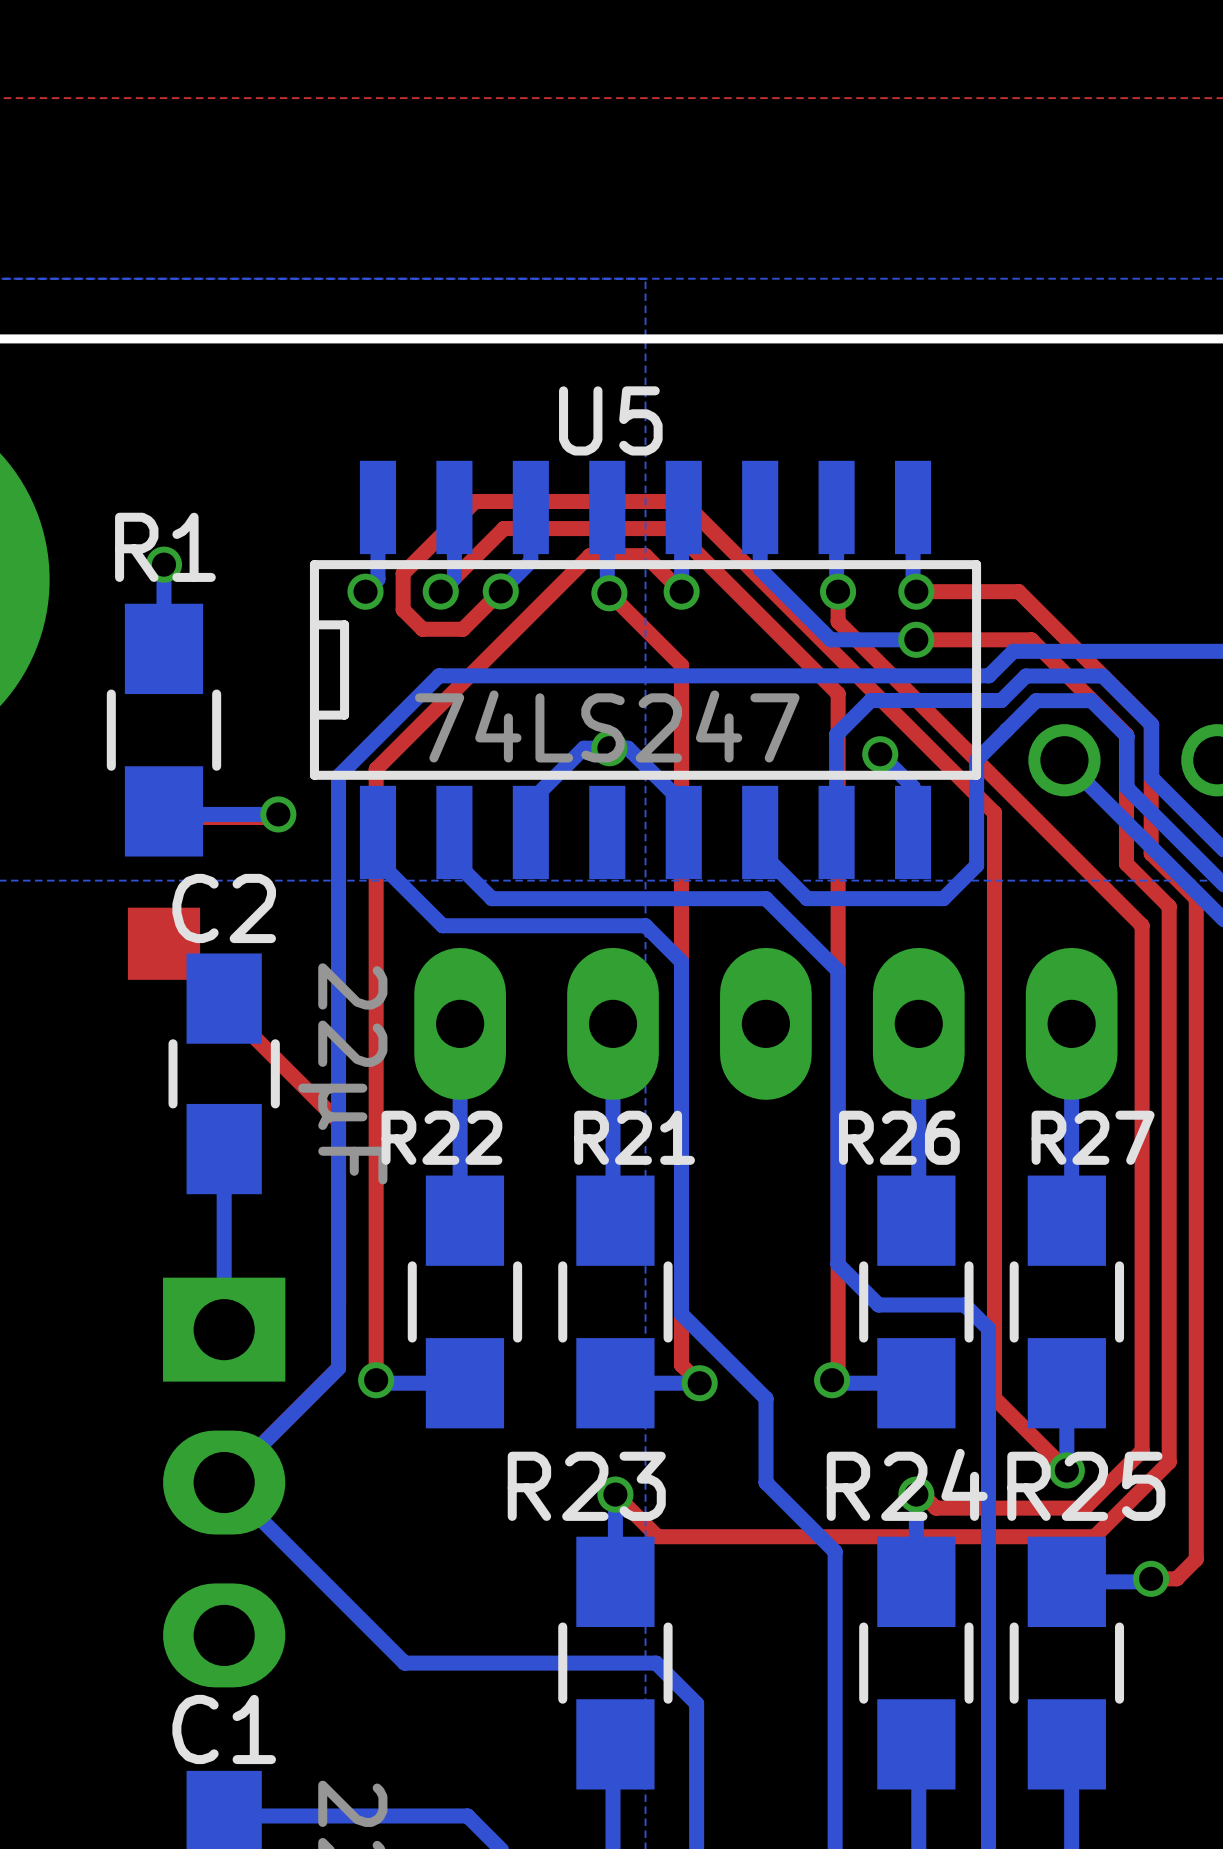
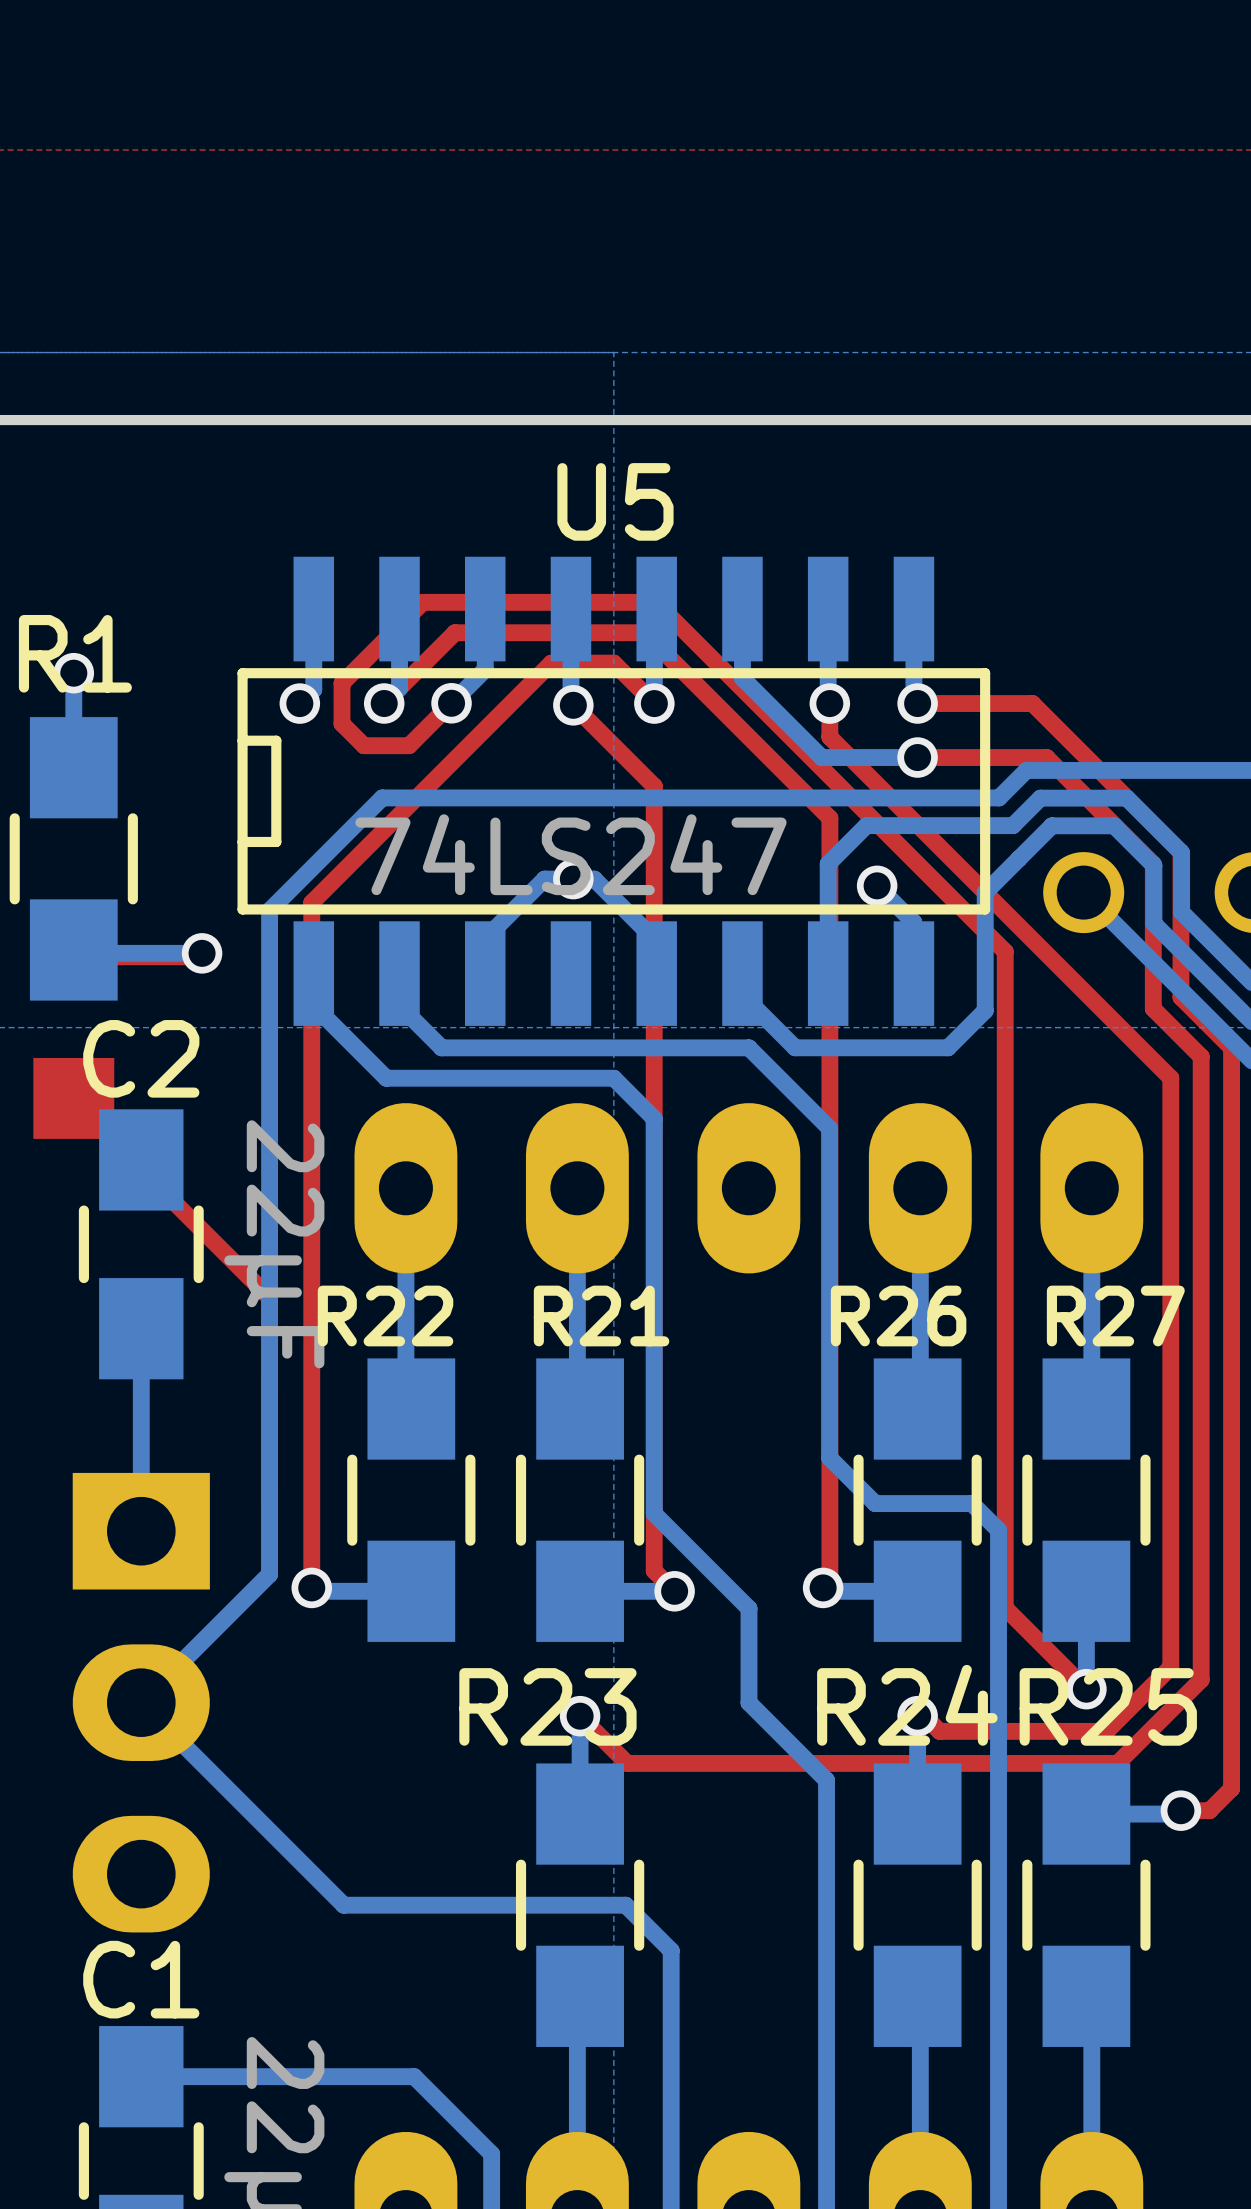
U5 name position: U5 (610, 420) -> U5 (615, 501)

